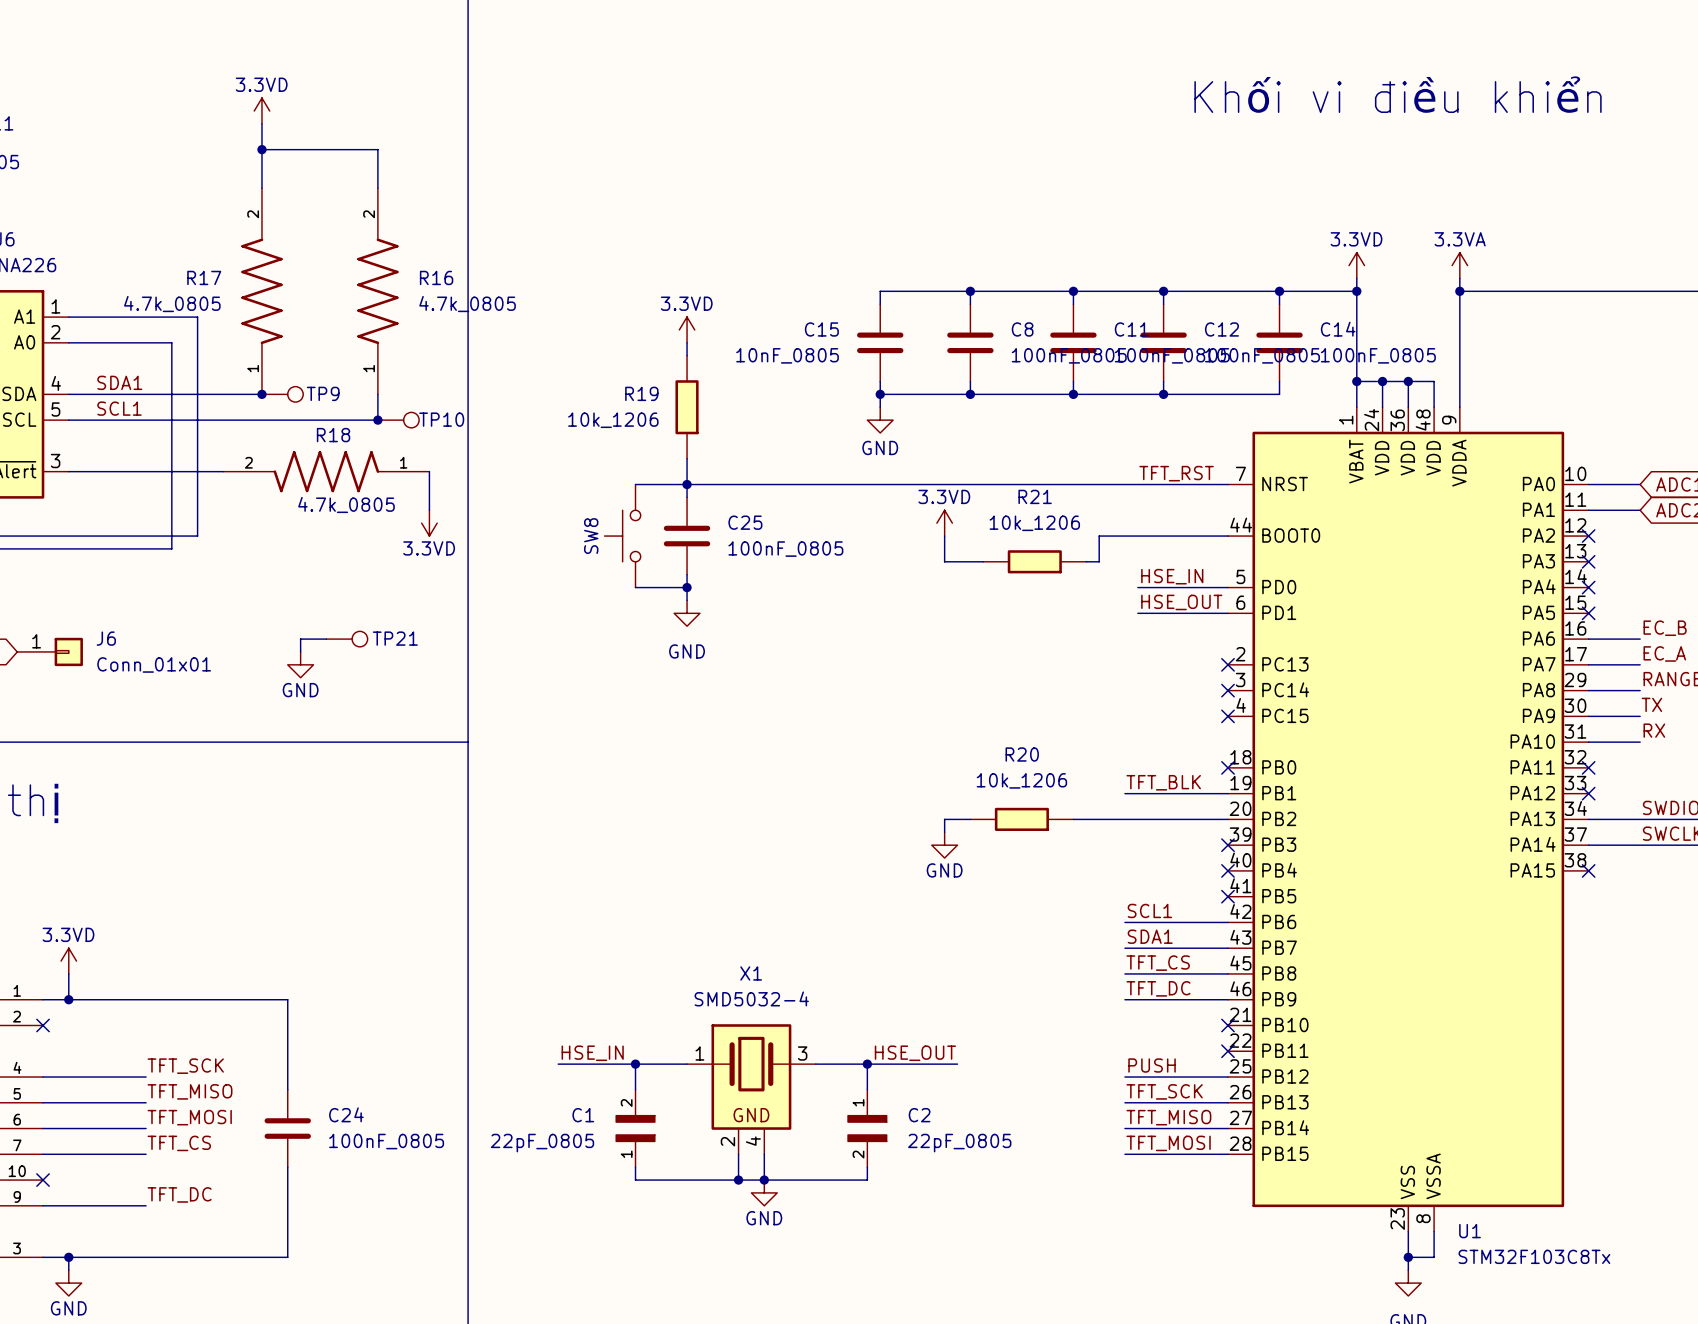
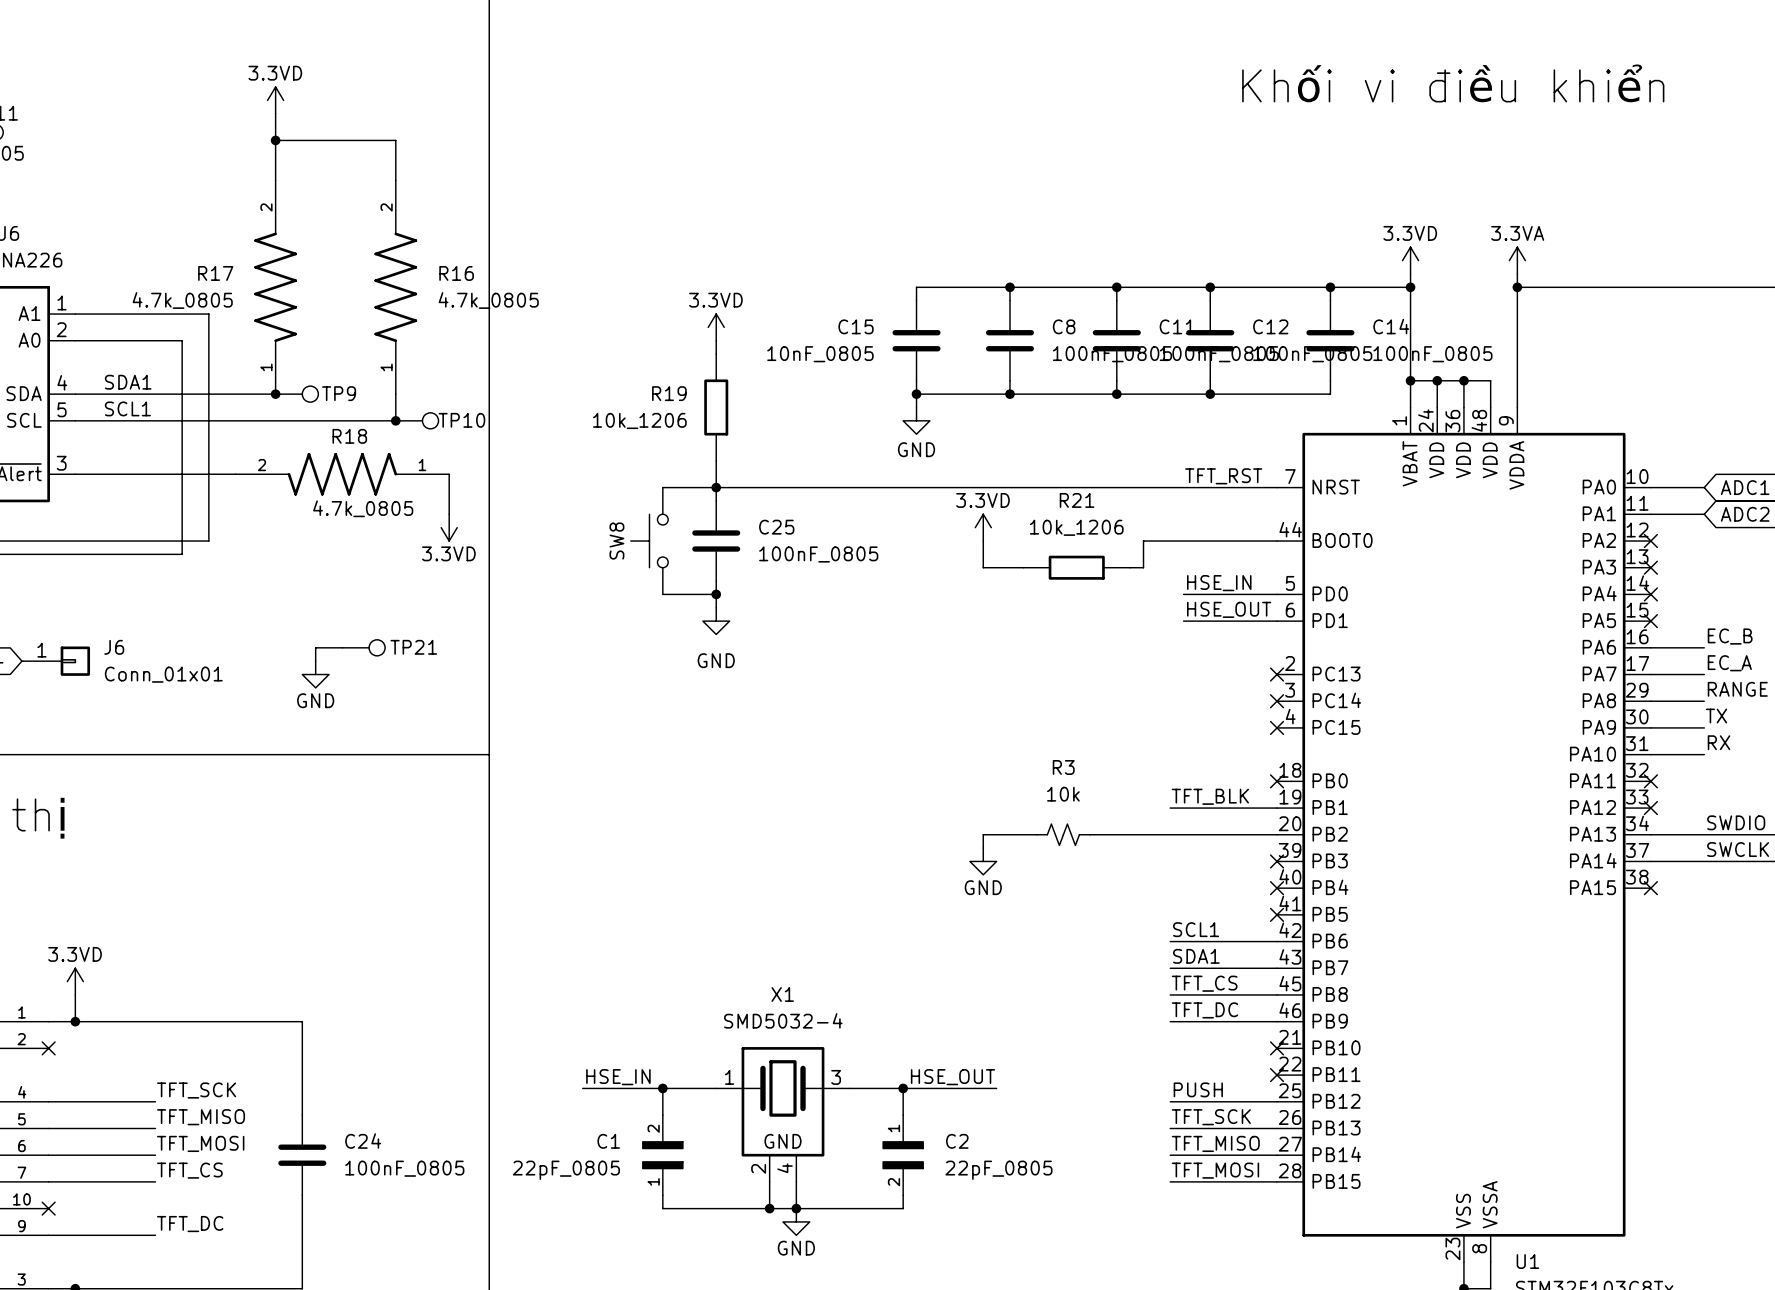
R20: 10k_1206 (1021, 819) -> none
R3: none -> 10k (1063, 834)

